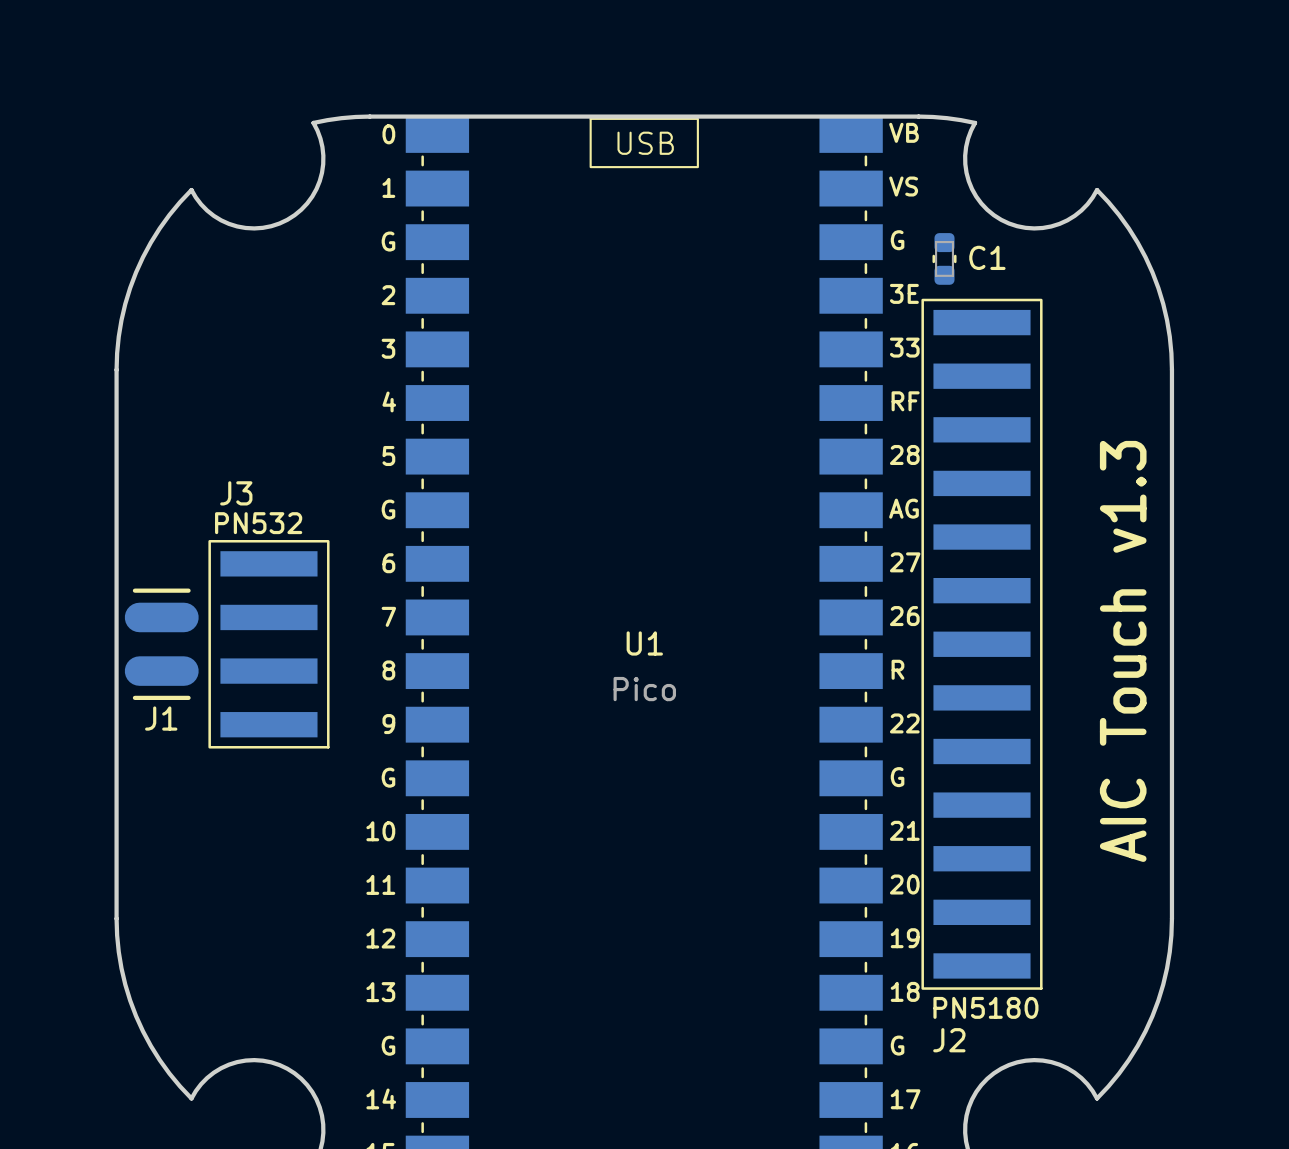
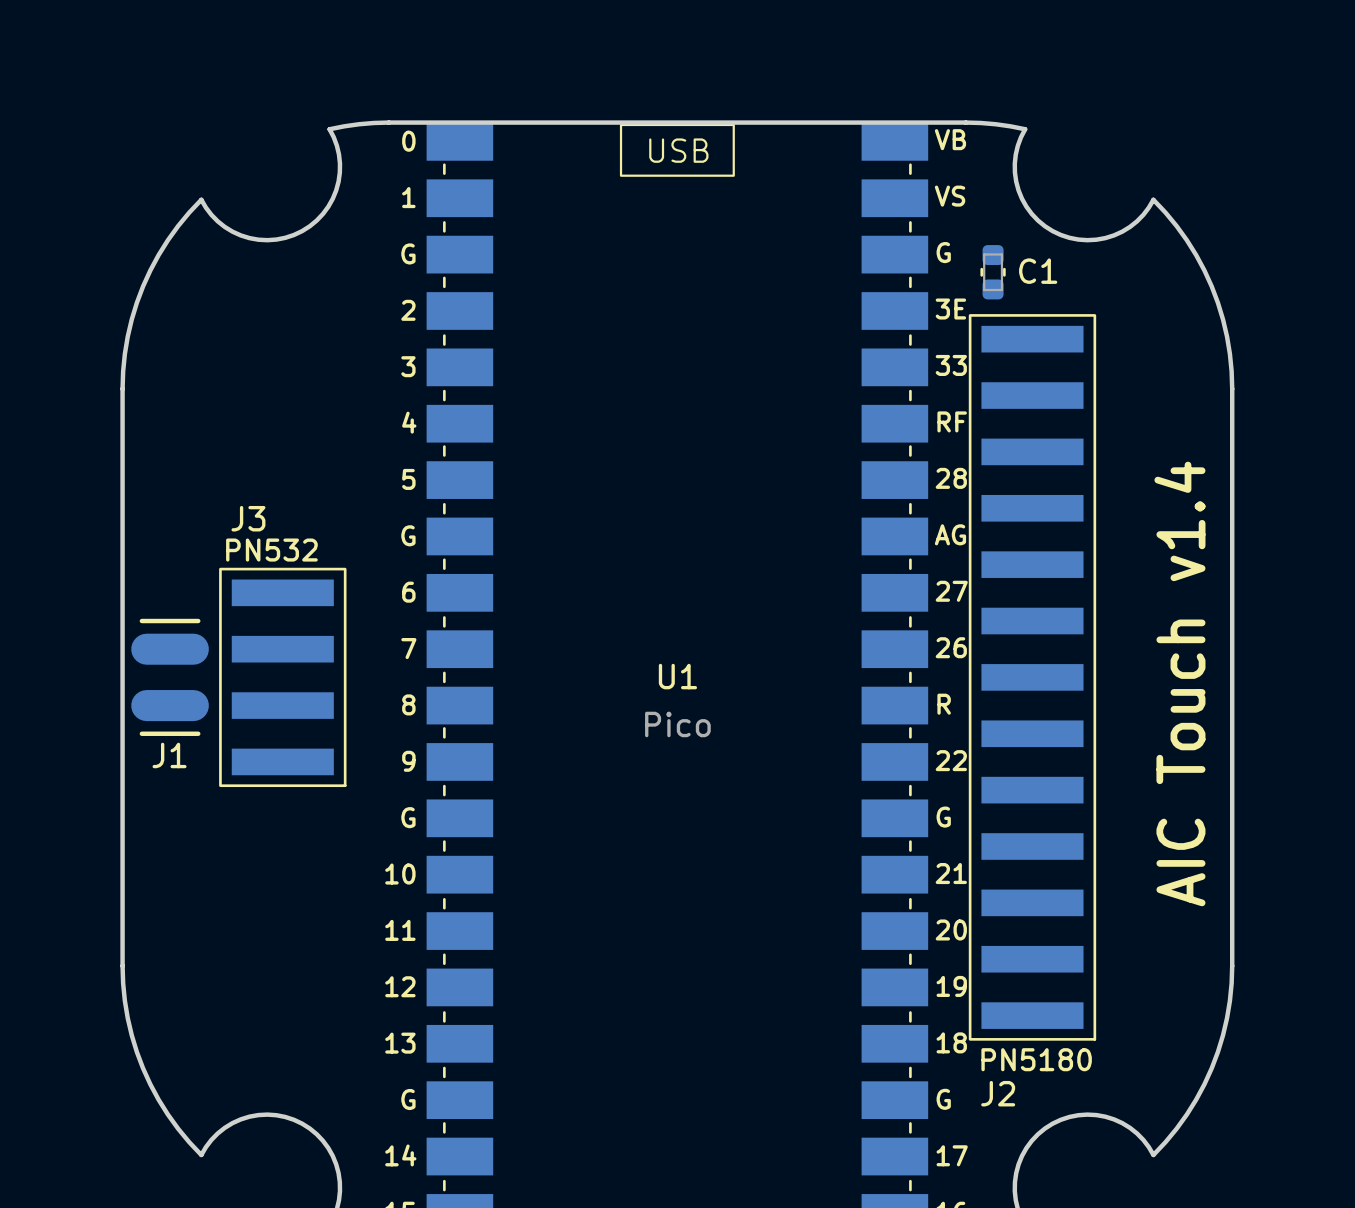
text: AIC Touch v1.3 (1123, 651) -> AIC Touch v1.4 (1179, 683)

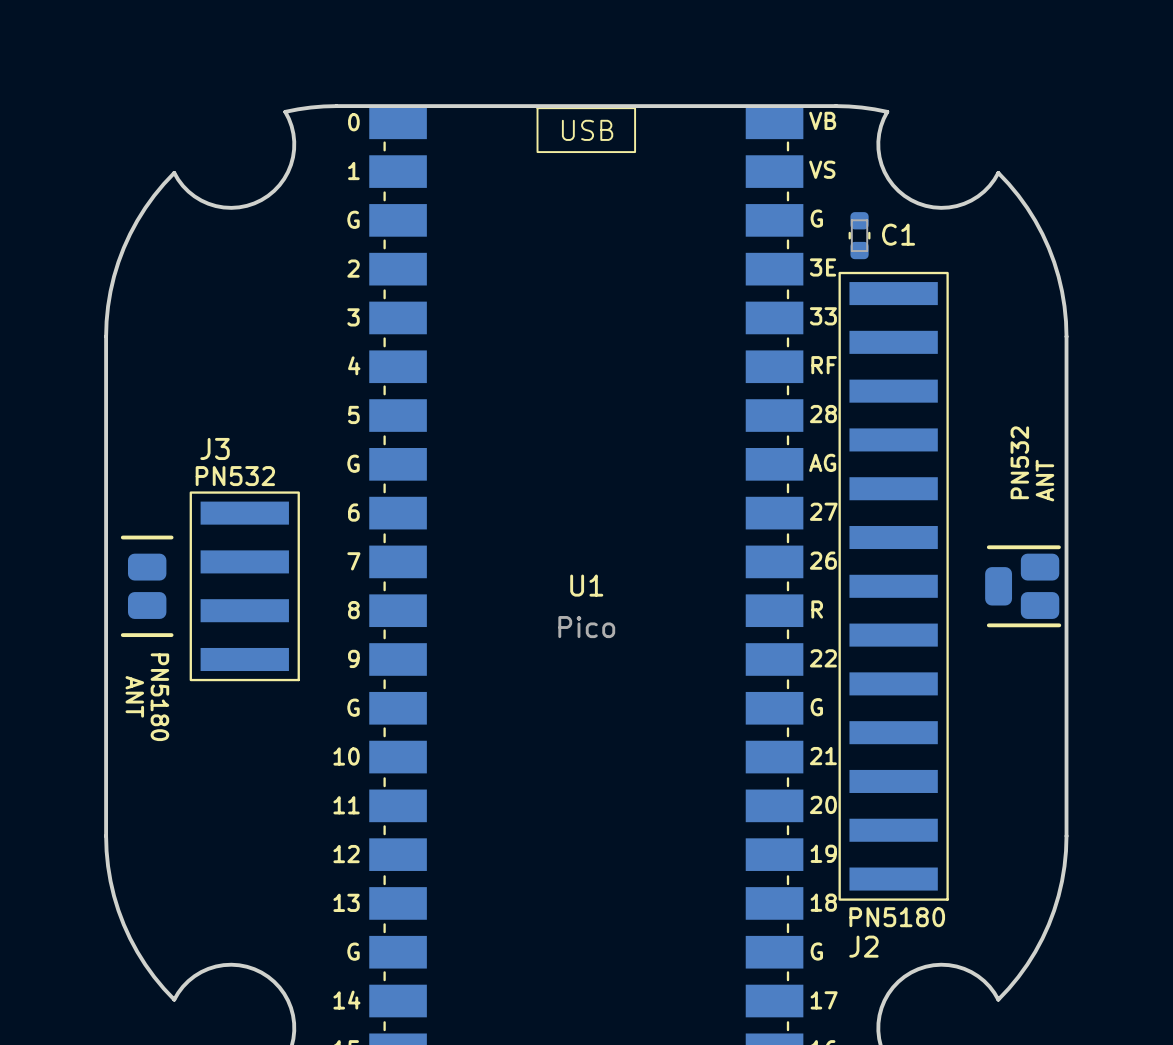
text: none -> PN532 (1019, 462)
text: none -> ANT (1044, 480)
J1: (170, 677) -> none
part: none -> (147, 586)
part: none -> (1023, 586)
text: AIC Touch v1.4 (1179, 683) -> none
text: none -> ANT (134, 696)
text: none -> PN5180 (159, 697)

